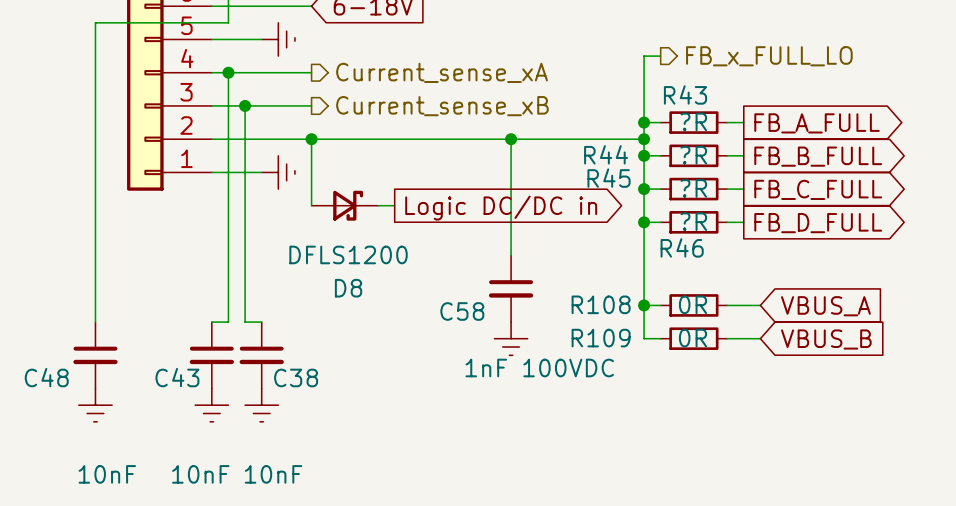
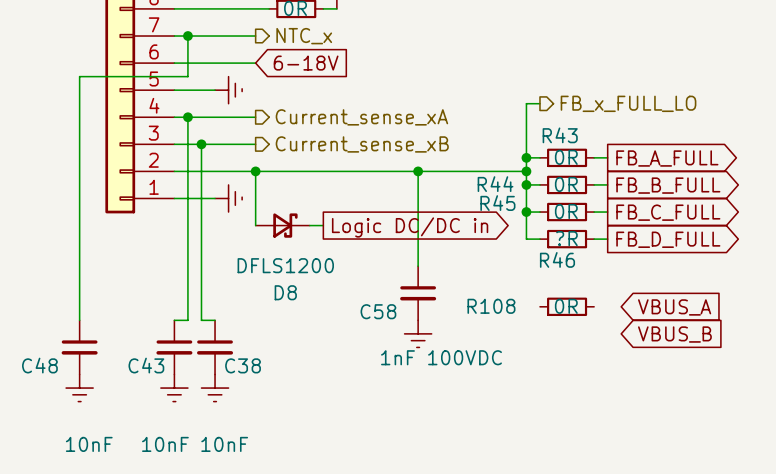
R43 value: ?R (693, 121) -> 0R (566, 157)
R44 value: ?R (693, 155) -> 0R (566, 184)
R45 value: ?R (693, 188) -> 0R (566, 211)
wire: (644, 222) (644, 338) (660, 338) -> none
junction: (644, 222) -> none
wire: (644, 305) (660, 305) -> none
junction: (644, 305) -> none
wire: (727, 305) (760, 305) -> none
R109: 0R (693, 338) -> none
wire: (727, 338) (760, 338) -> none

